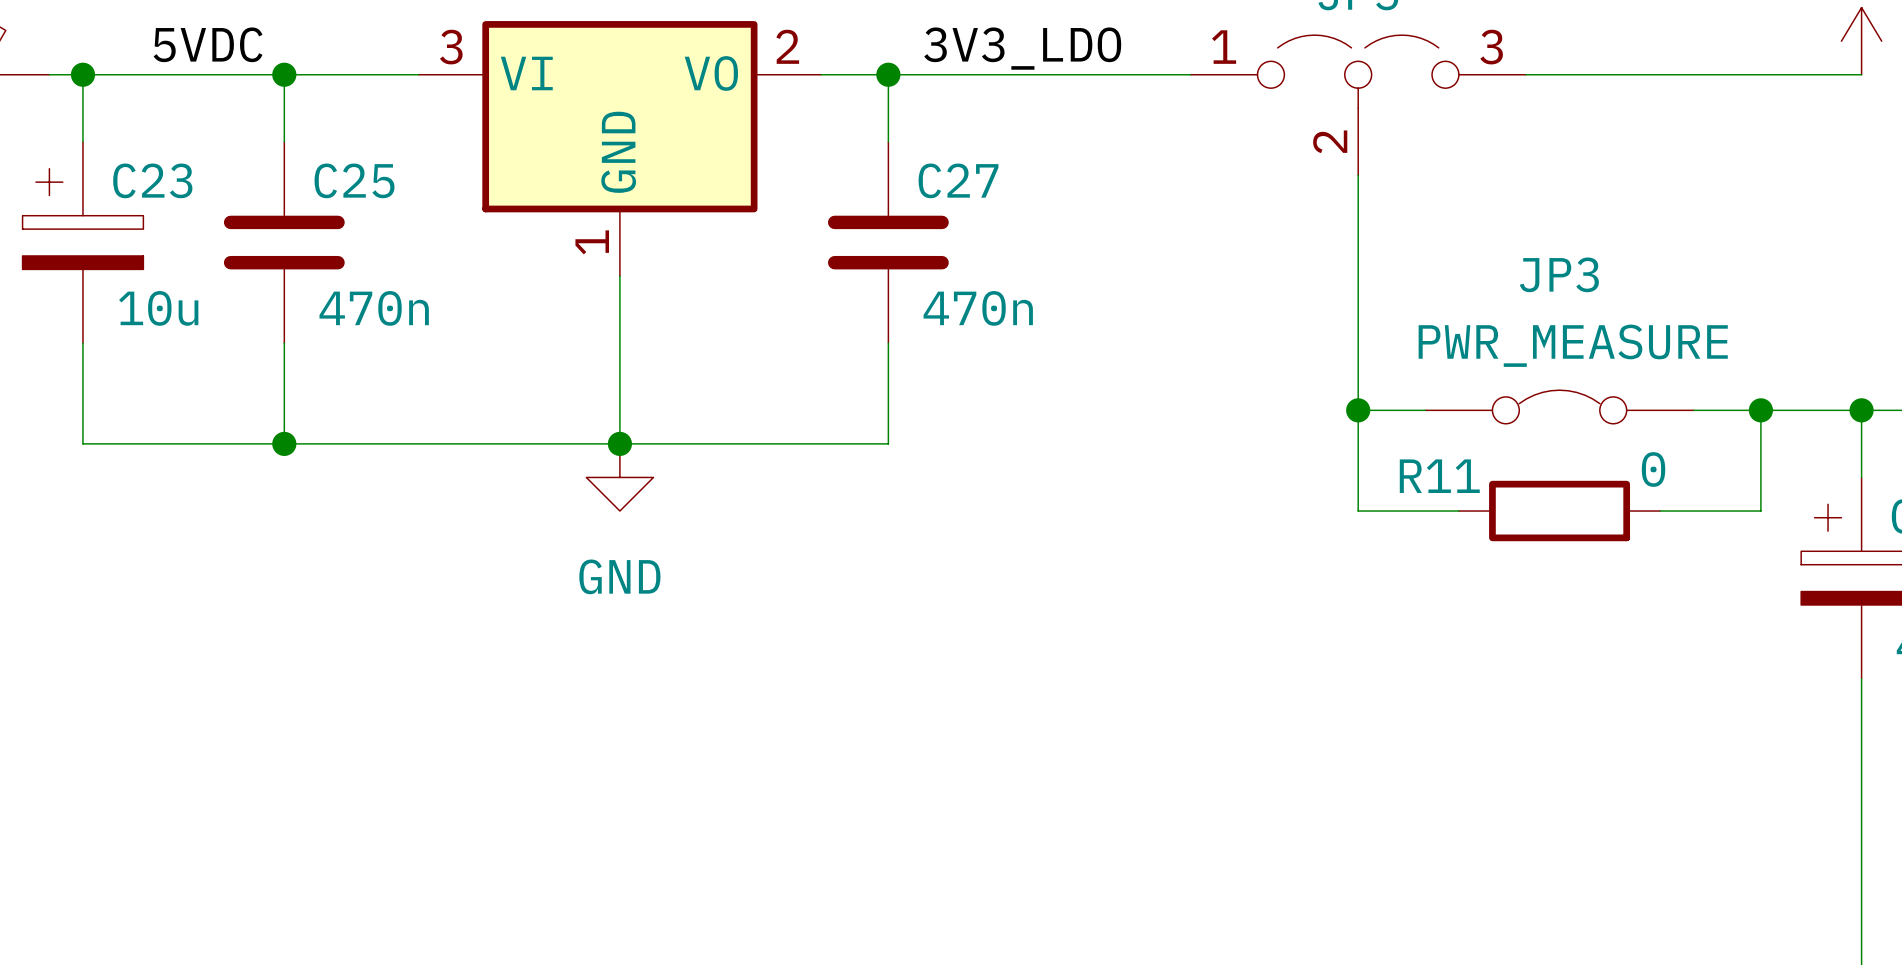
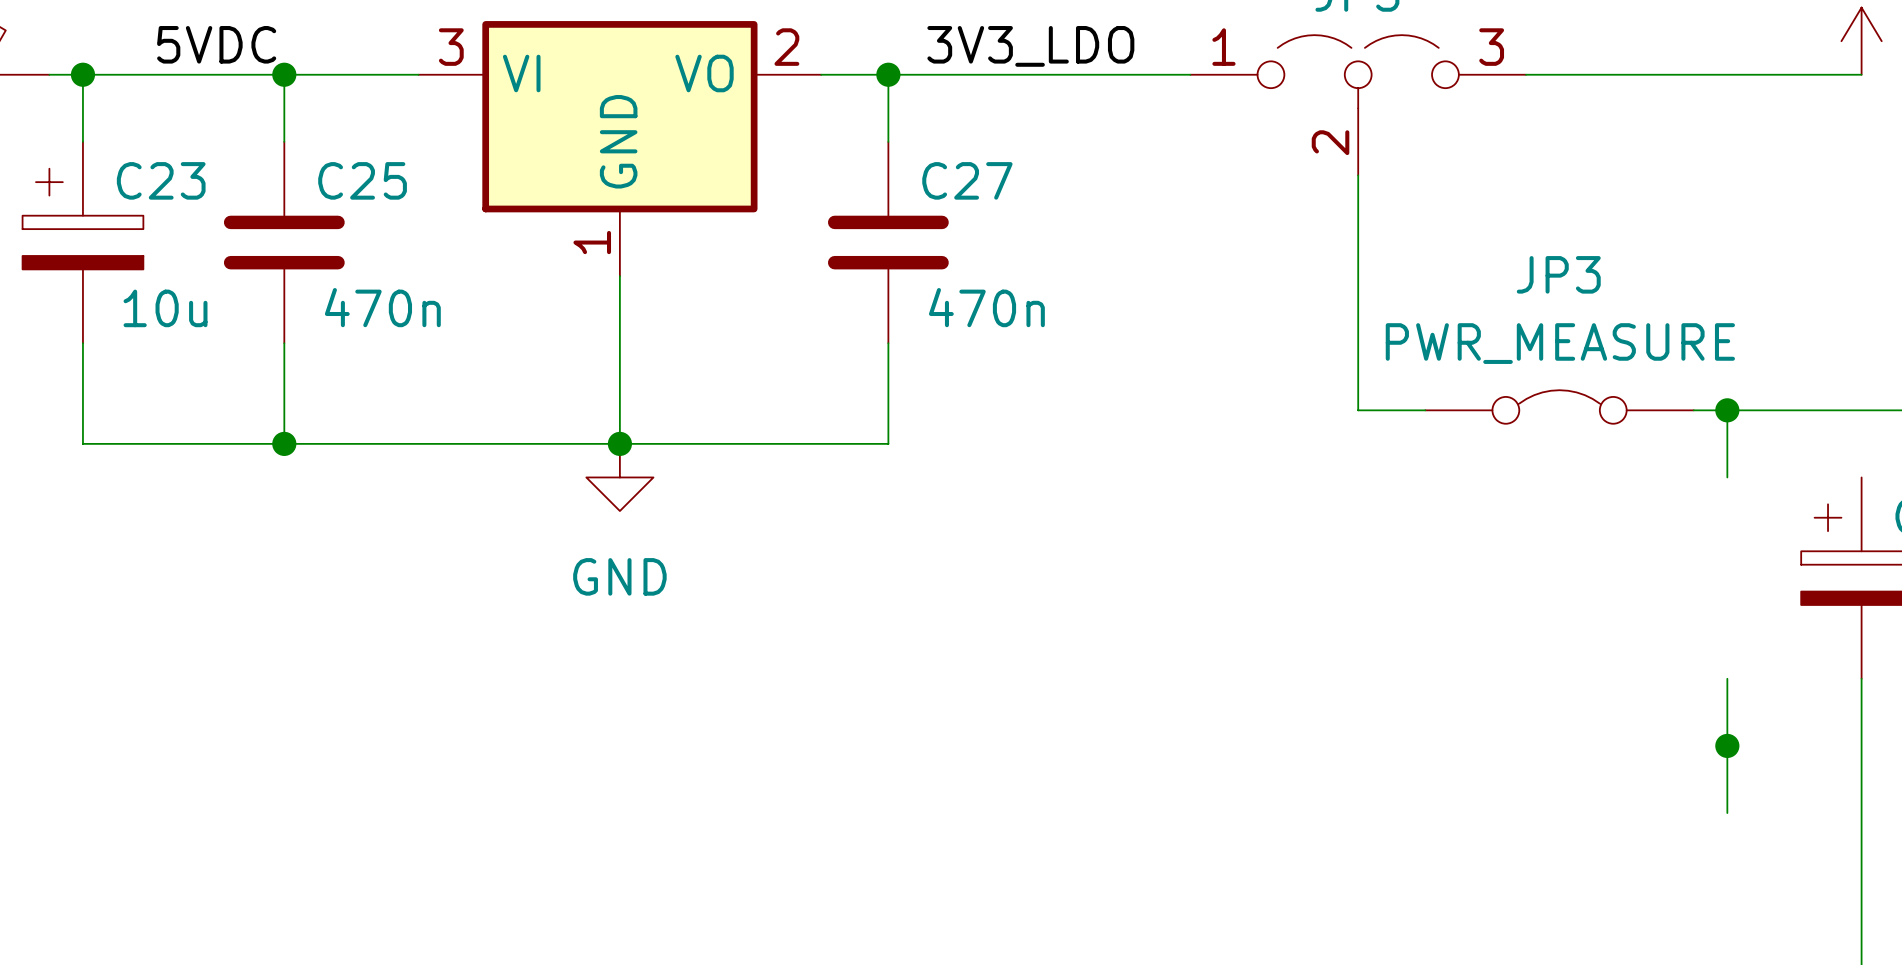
JP3 value position: PWR_MEASURE (1573, 345) -> PWR_MEASURE (1560, 343)
wire: (1358, 410) (1358, 511) (1458, 511) -> none
junction: (1358, 410) -> none
wire: (1760, 410) (1760, 511) (1660, 511) -> none
junction position: (1760, 410) -> (1727, 410)
wire: (1861, 410) (1861, 477) -> (1727, 410) (1727, 477)
junction: (1861, 410) -> none
R11: 0 (1559, 511) -> none
wire: none -> (1727, 678) (1727, 813)
junction: none -> (1727, 745)

